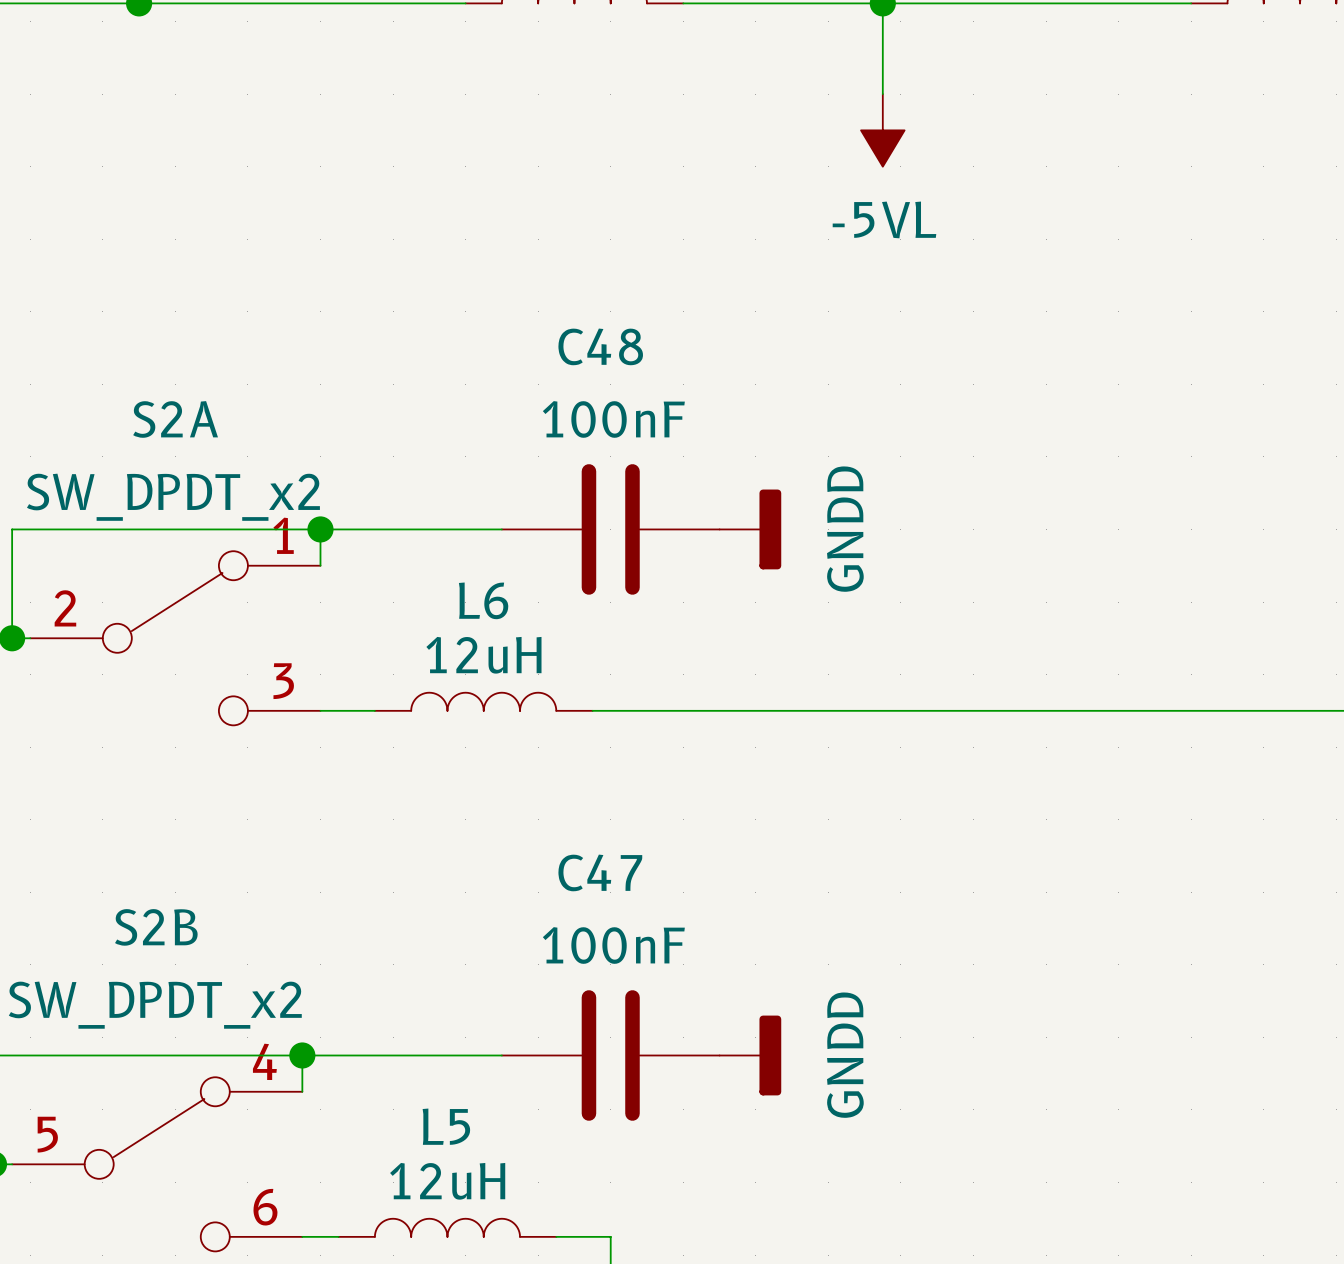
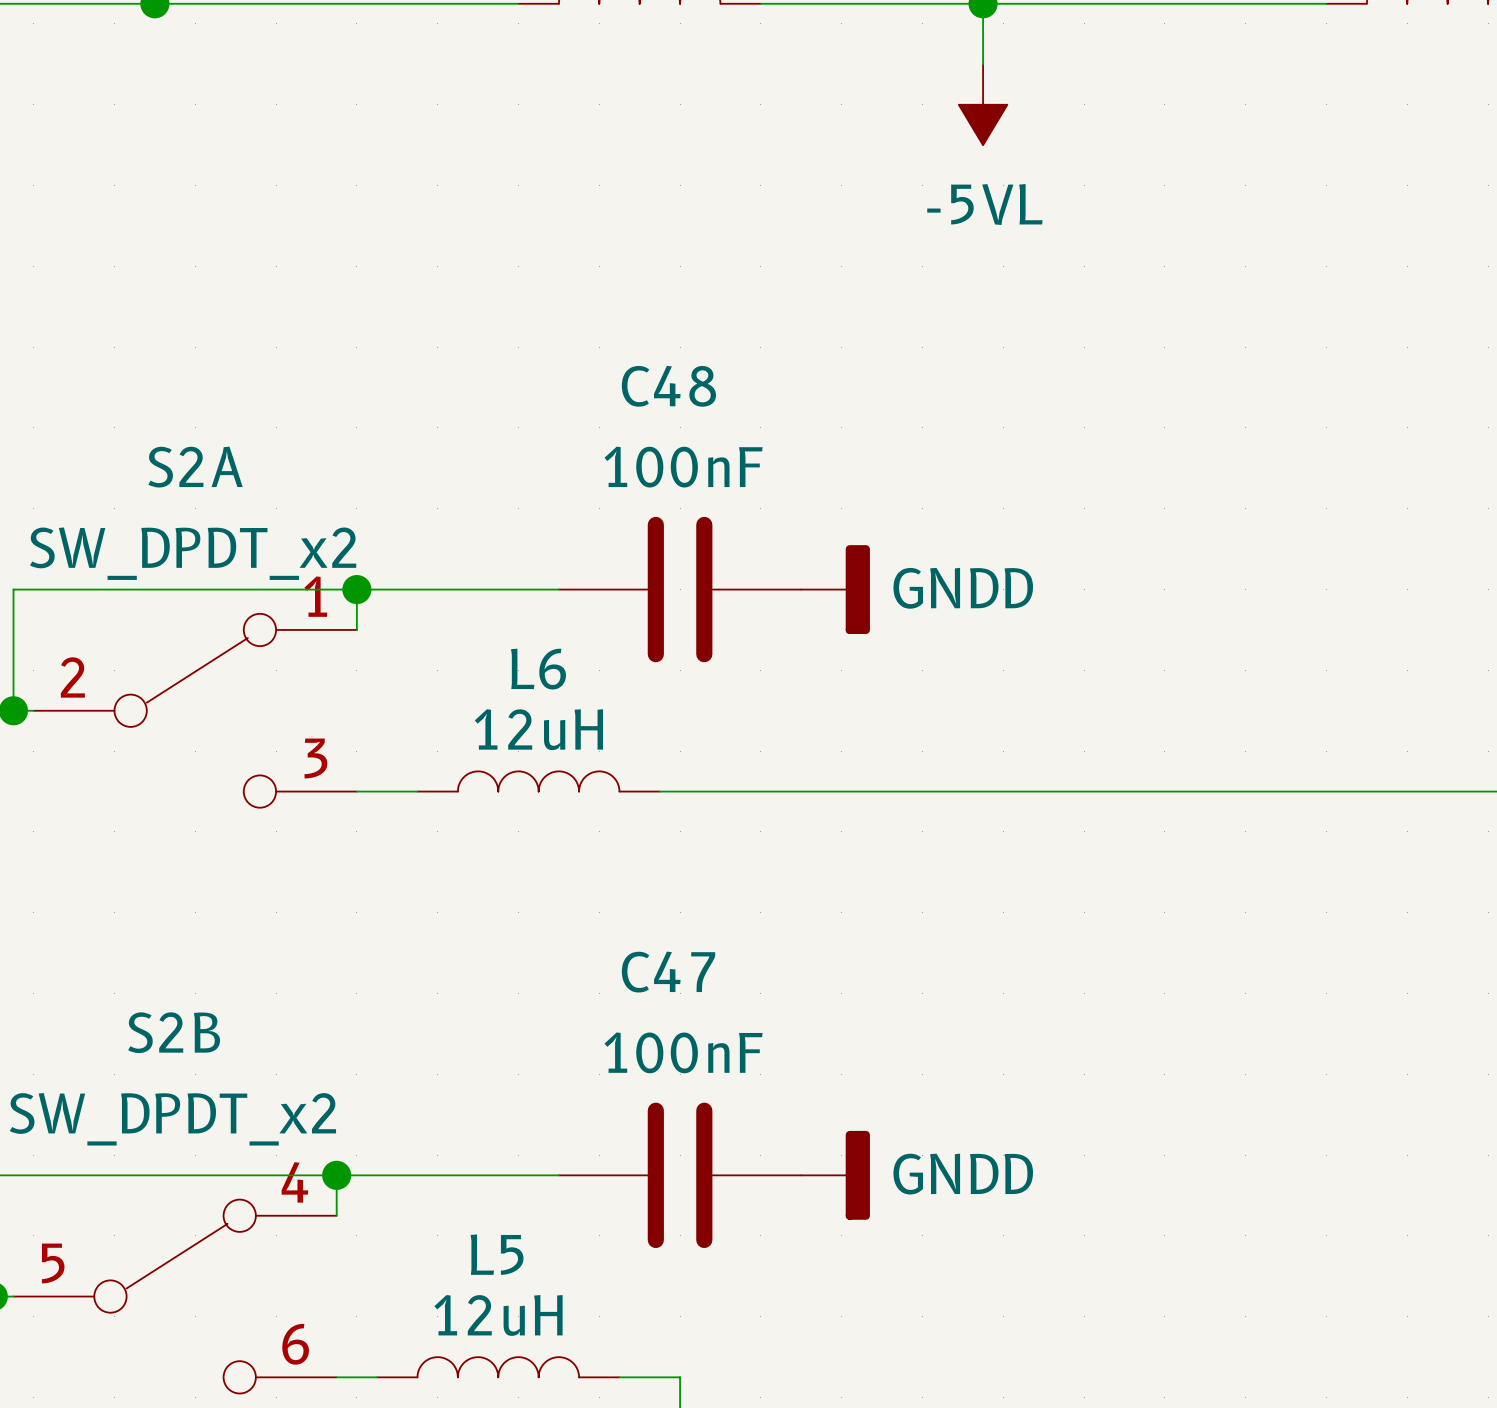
power symbol position: -5VL (882, 130) -> -5VL (983, 104)
power symbol text rotation: 0° (845, 529) -> 90° clockwise (963, 588)
power symbol text rotation: 0° (845, 1055) -> 90° clockwise (963, 1174)

